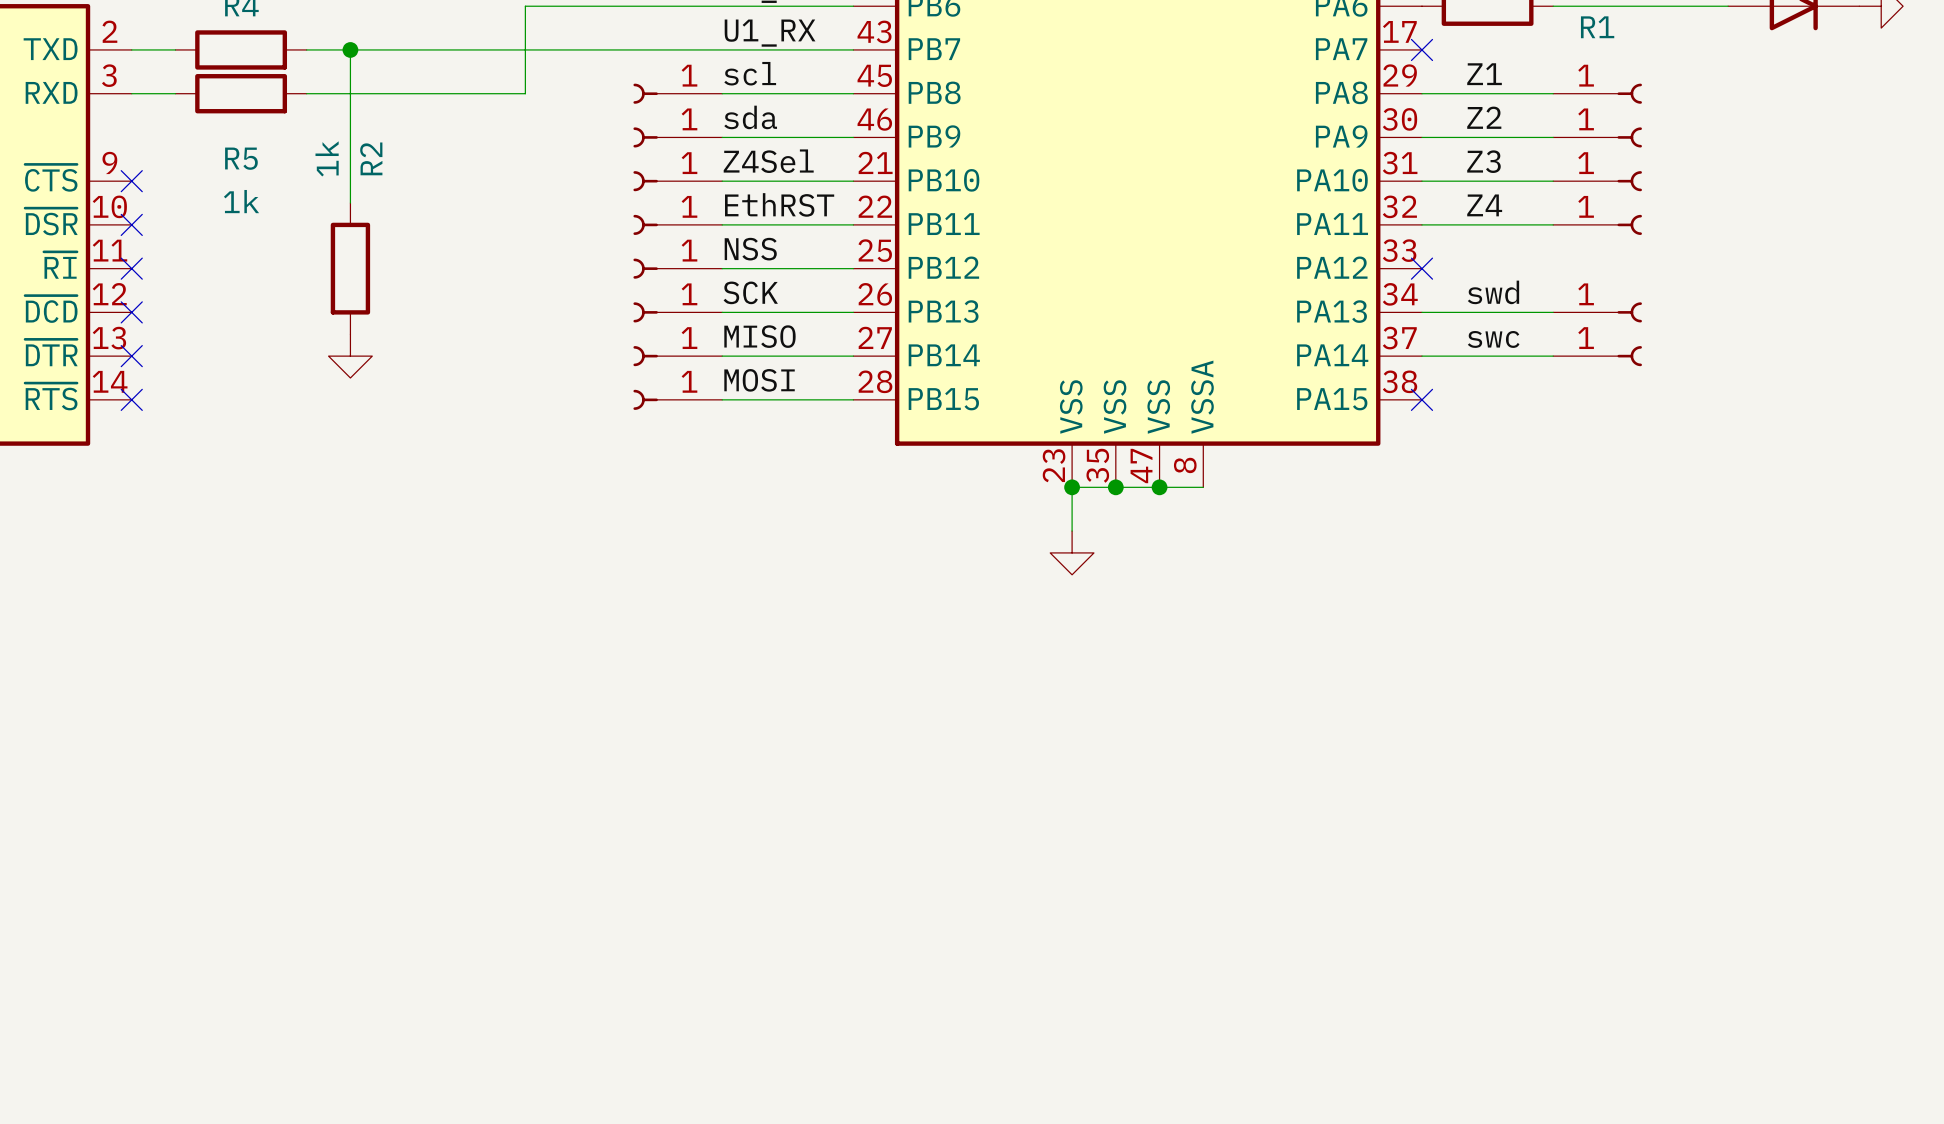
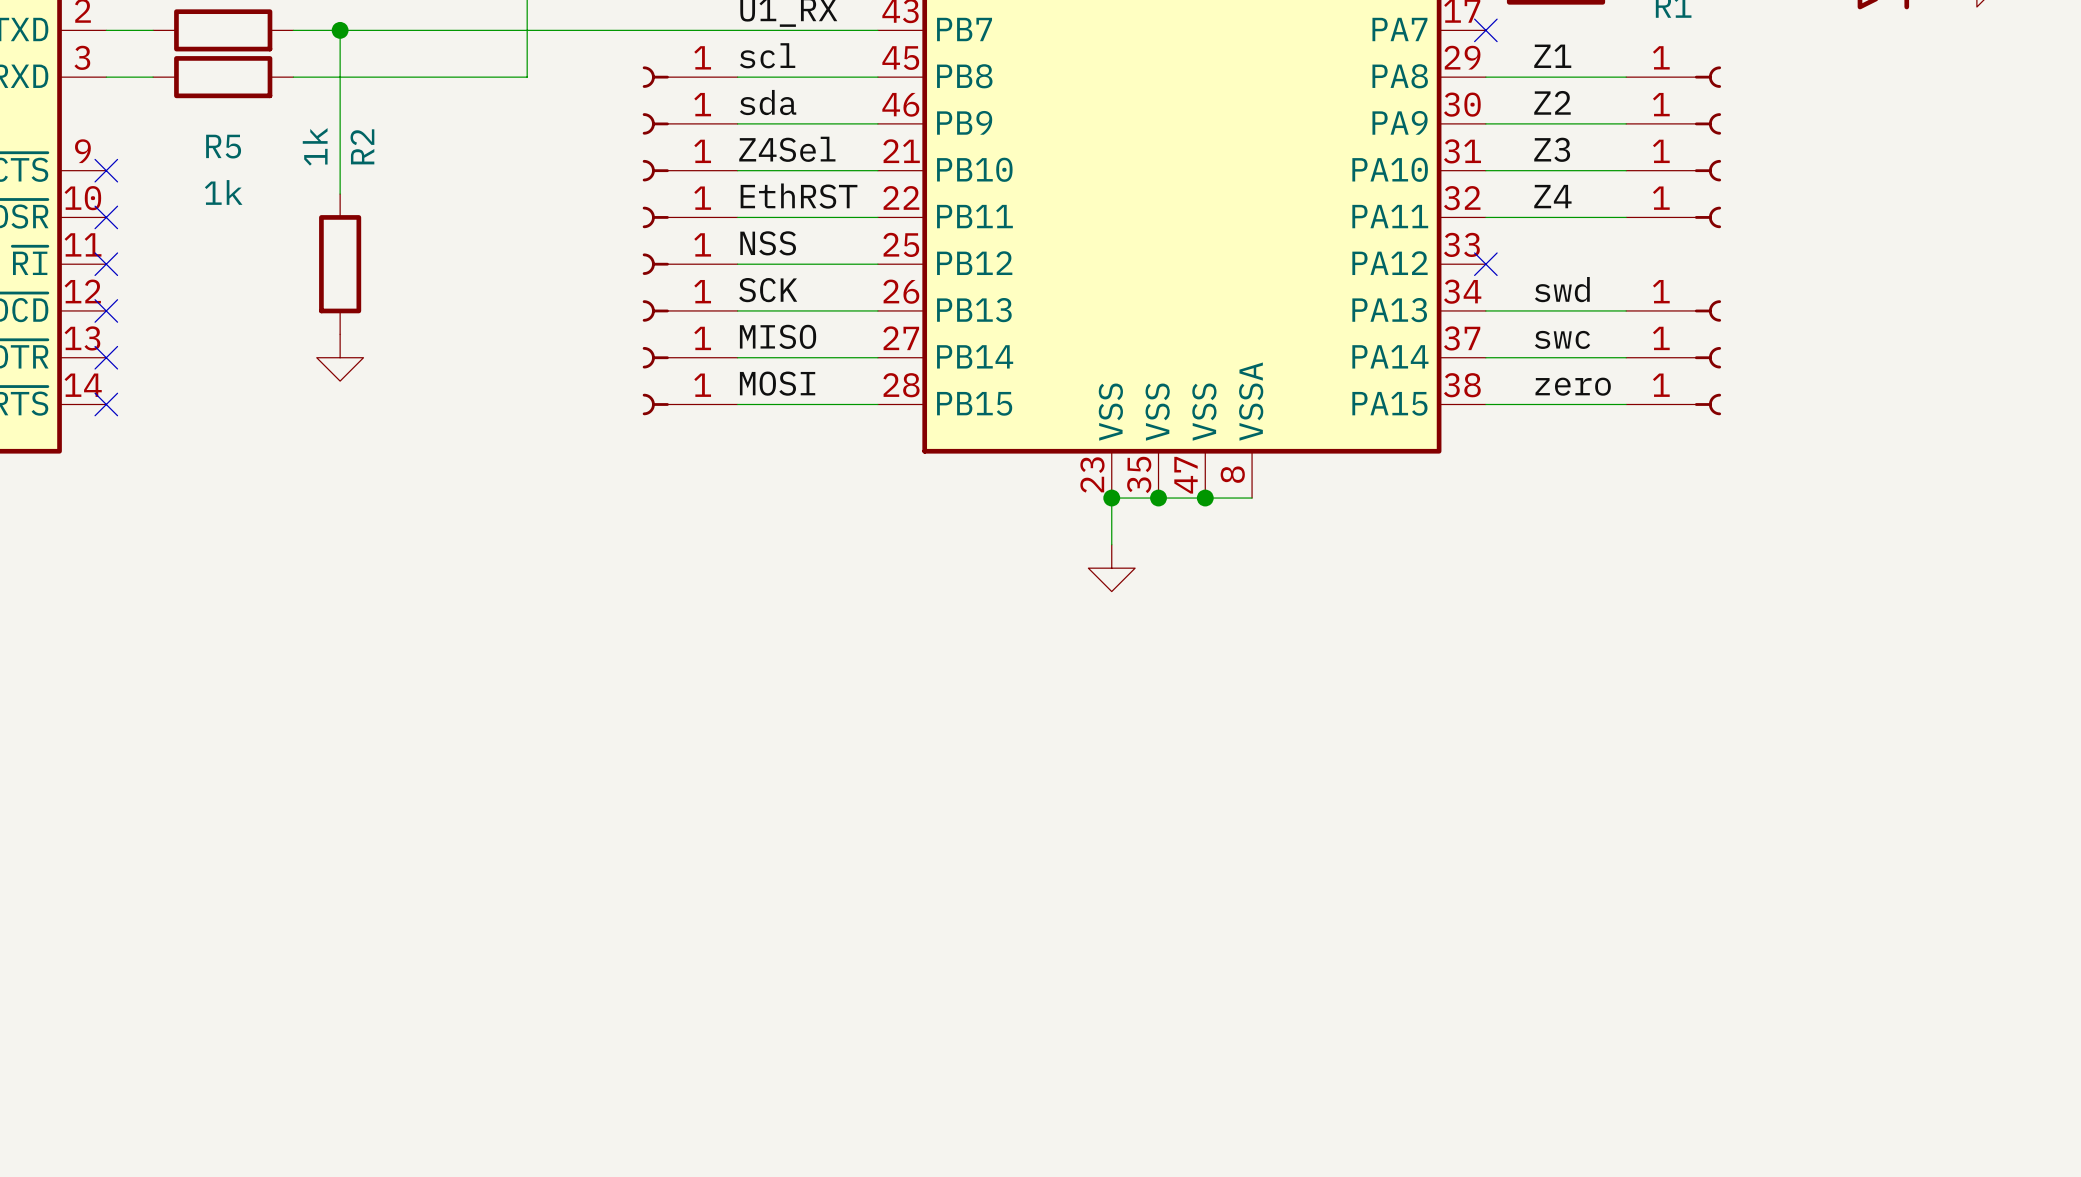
label: none -> zero (1573, 386)
wire: none -> (1485, 404) (1626, 404)
no-connect mark: (1421, 399) -> none
part: none -> (1673, 404)

